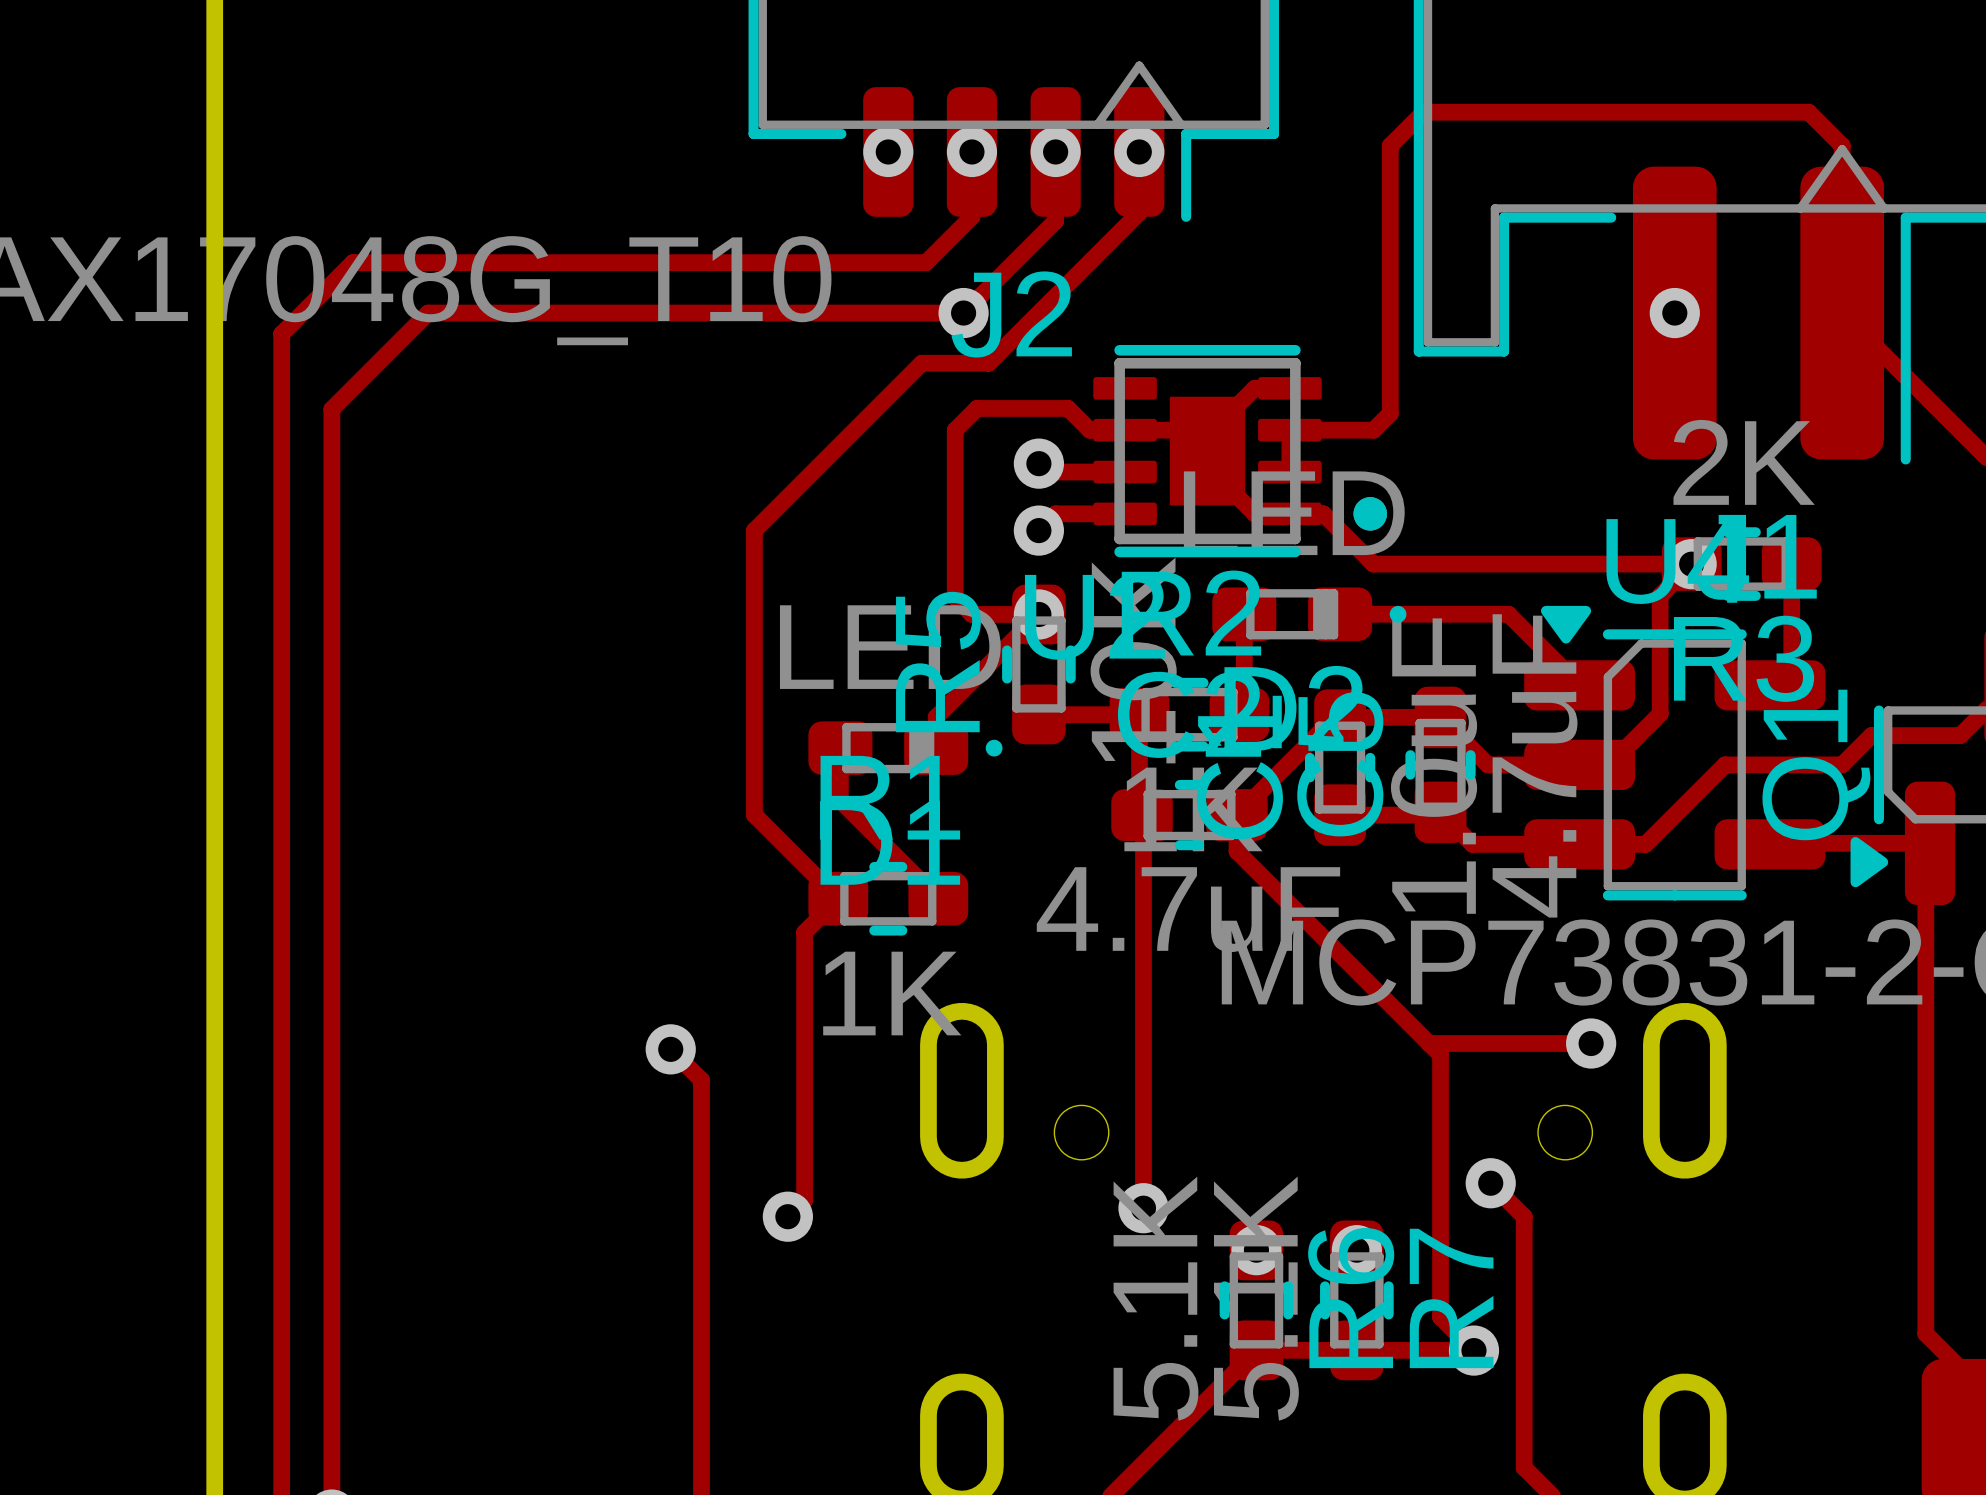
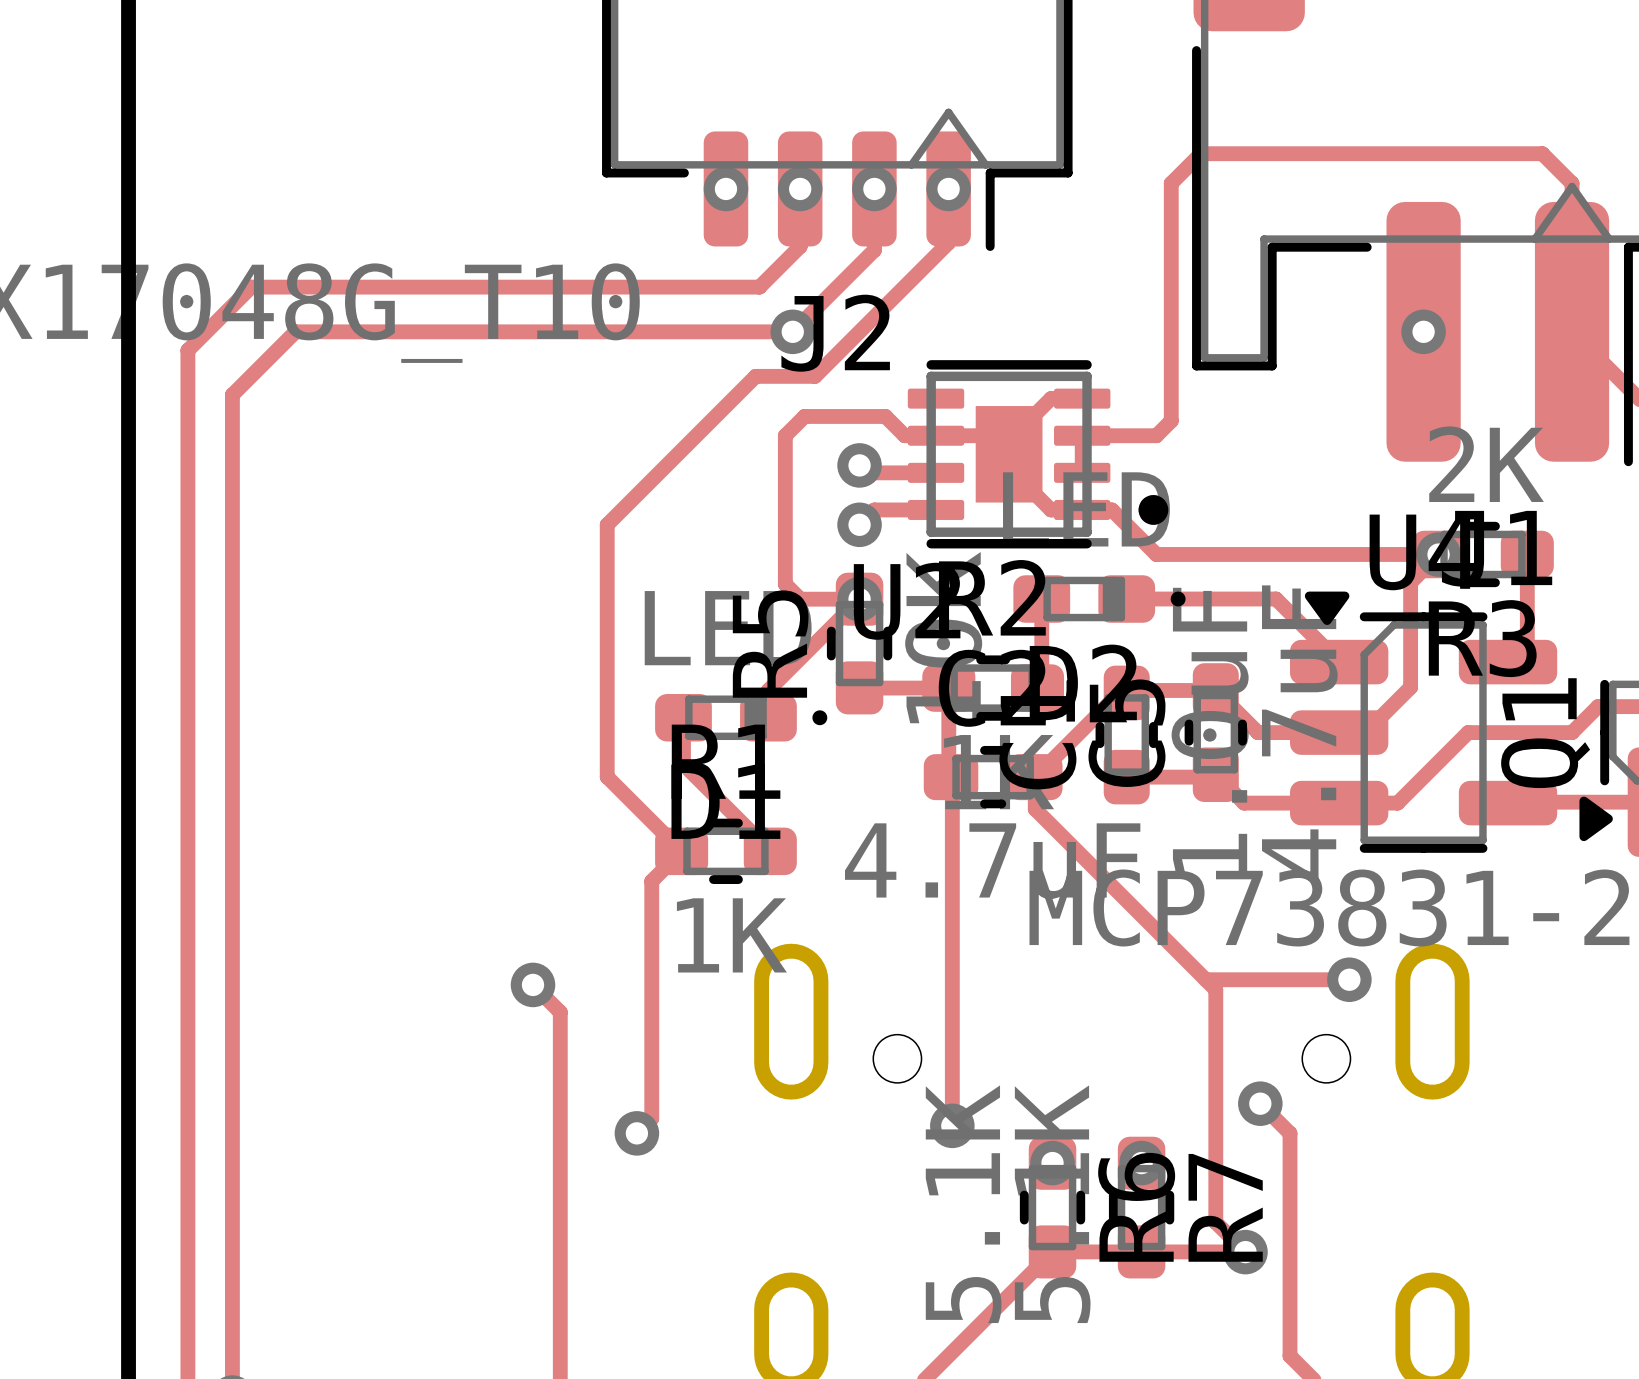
track: (428, 313) (331, 409) -> (317, 331) (295, 331) (232, 394) (232, 417)

